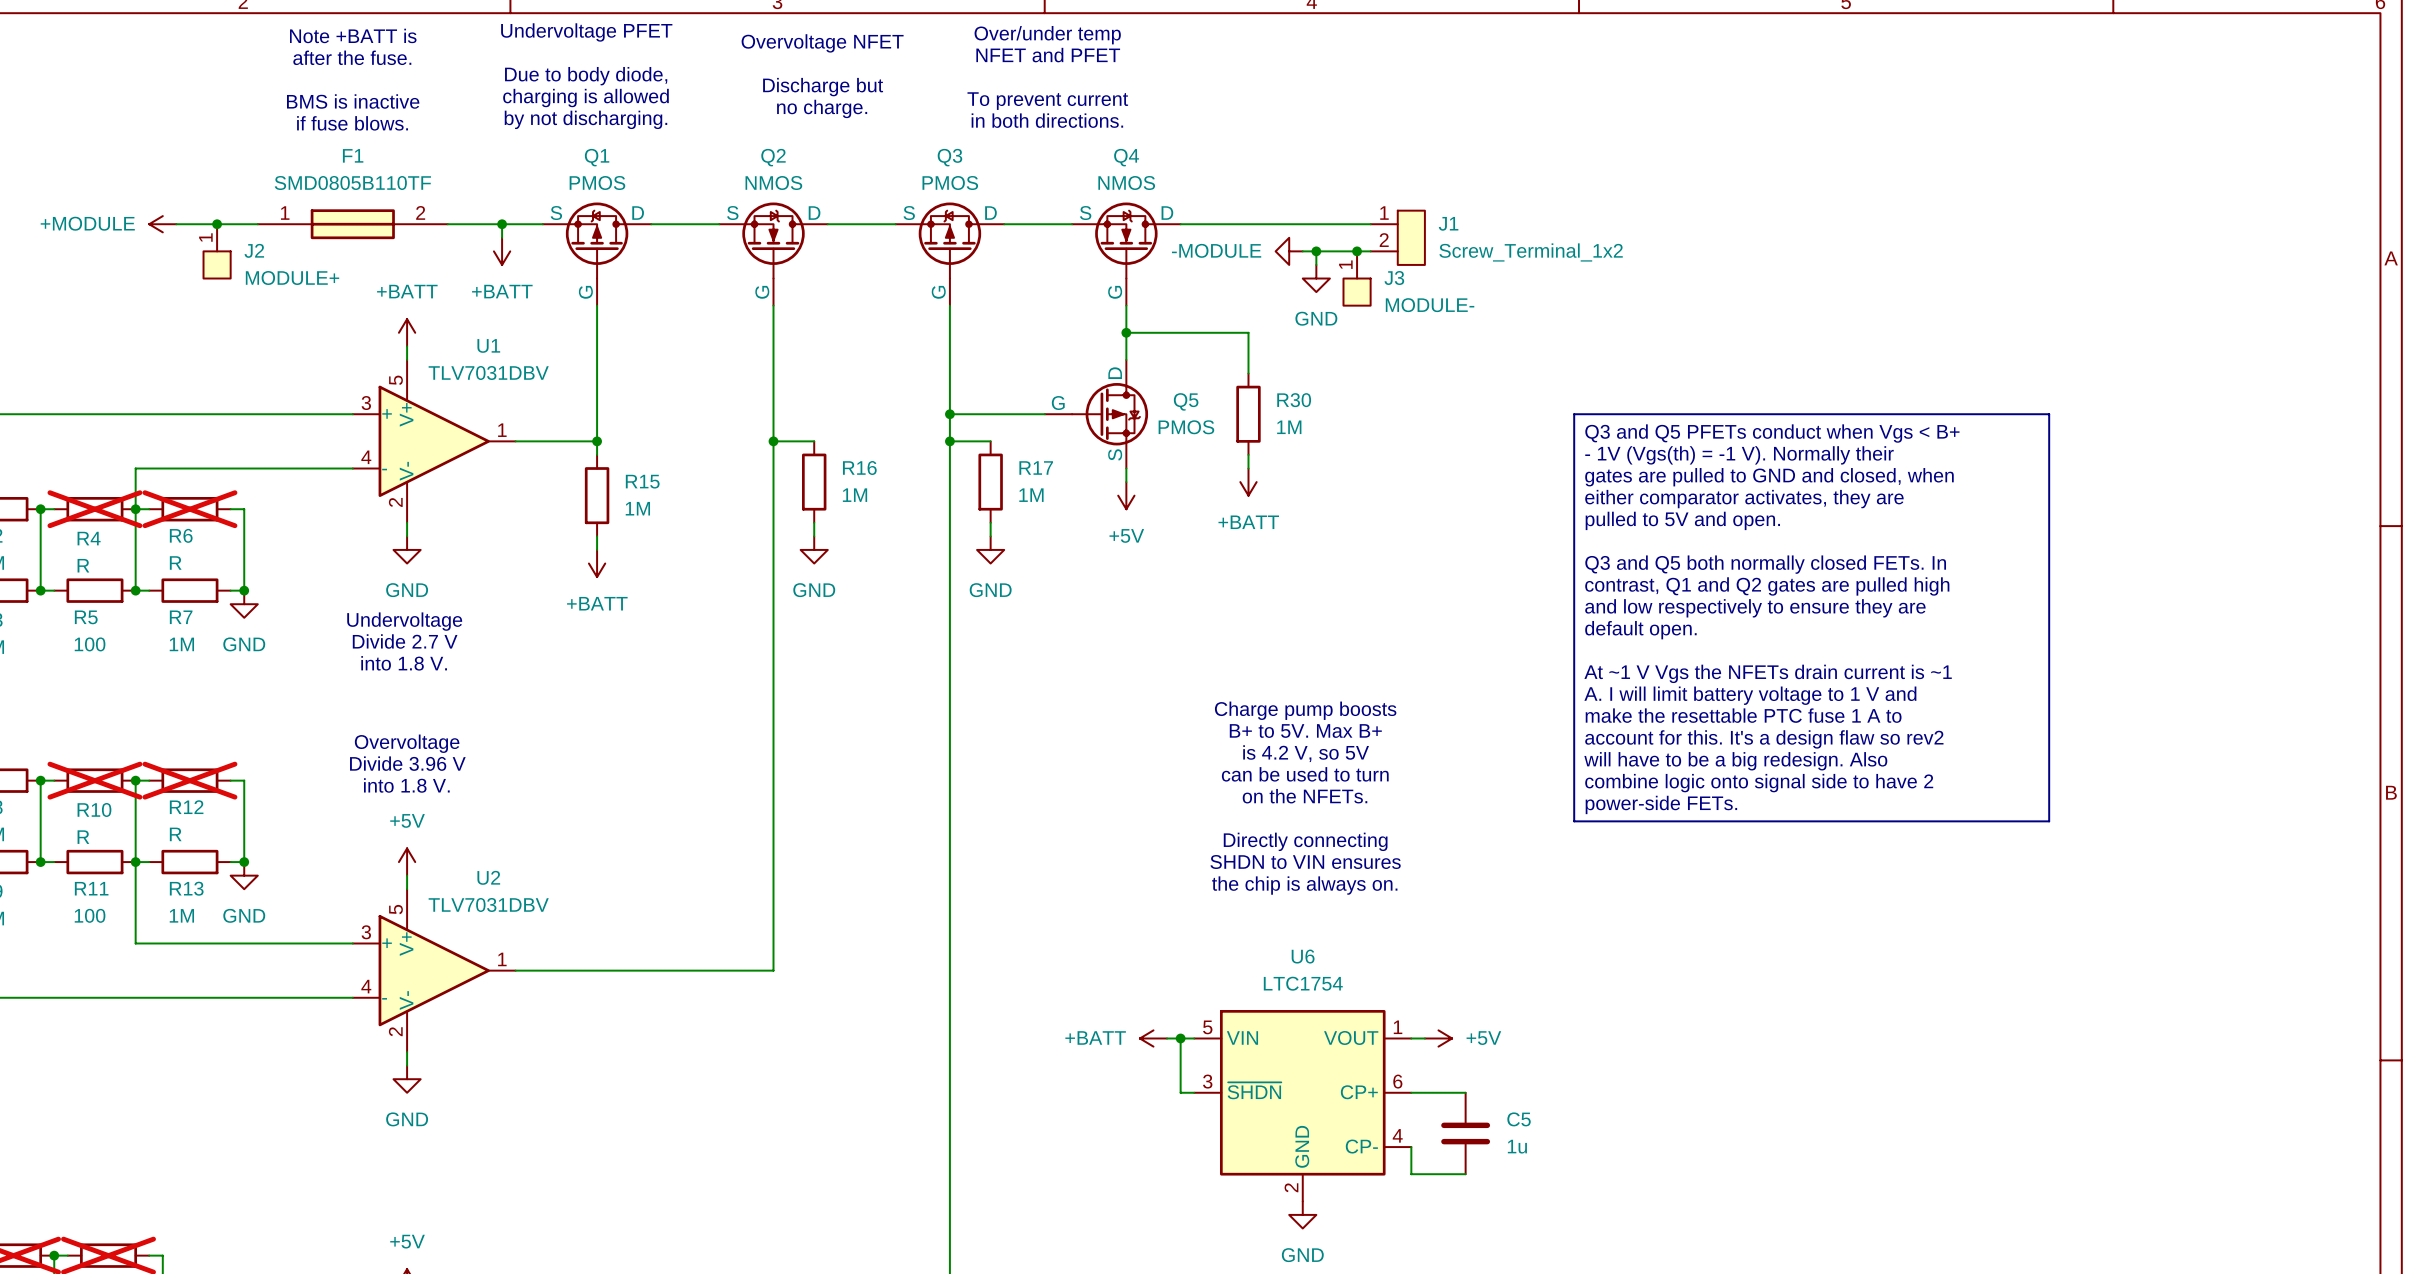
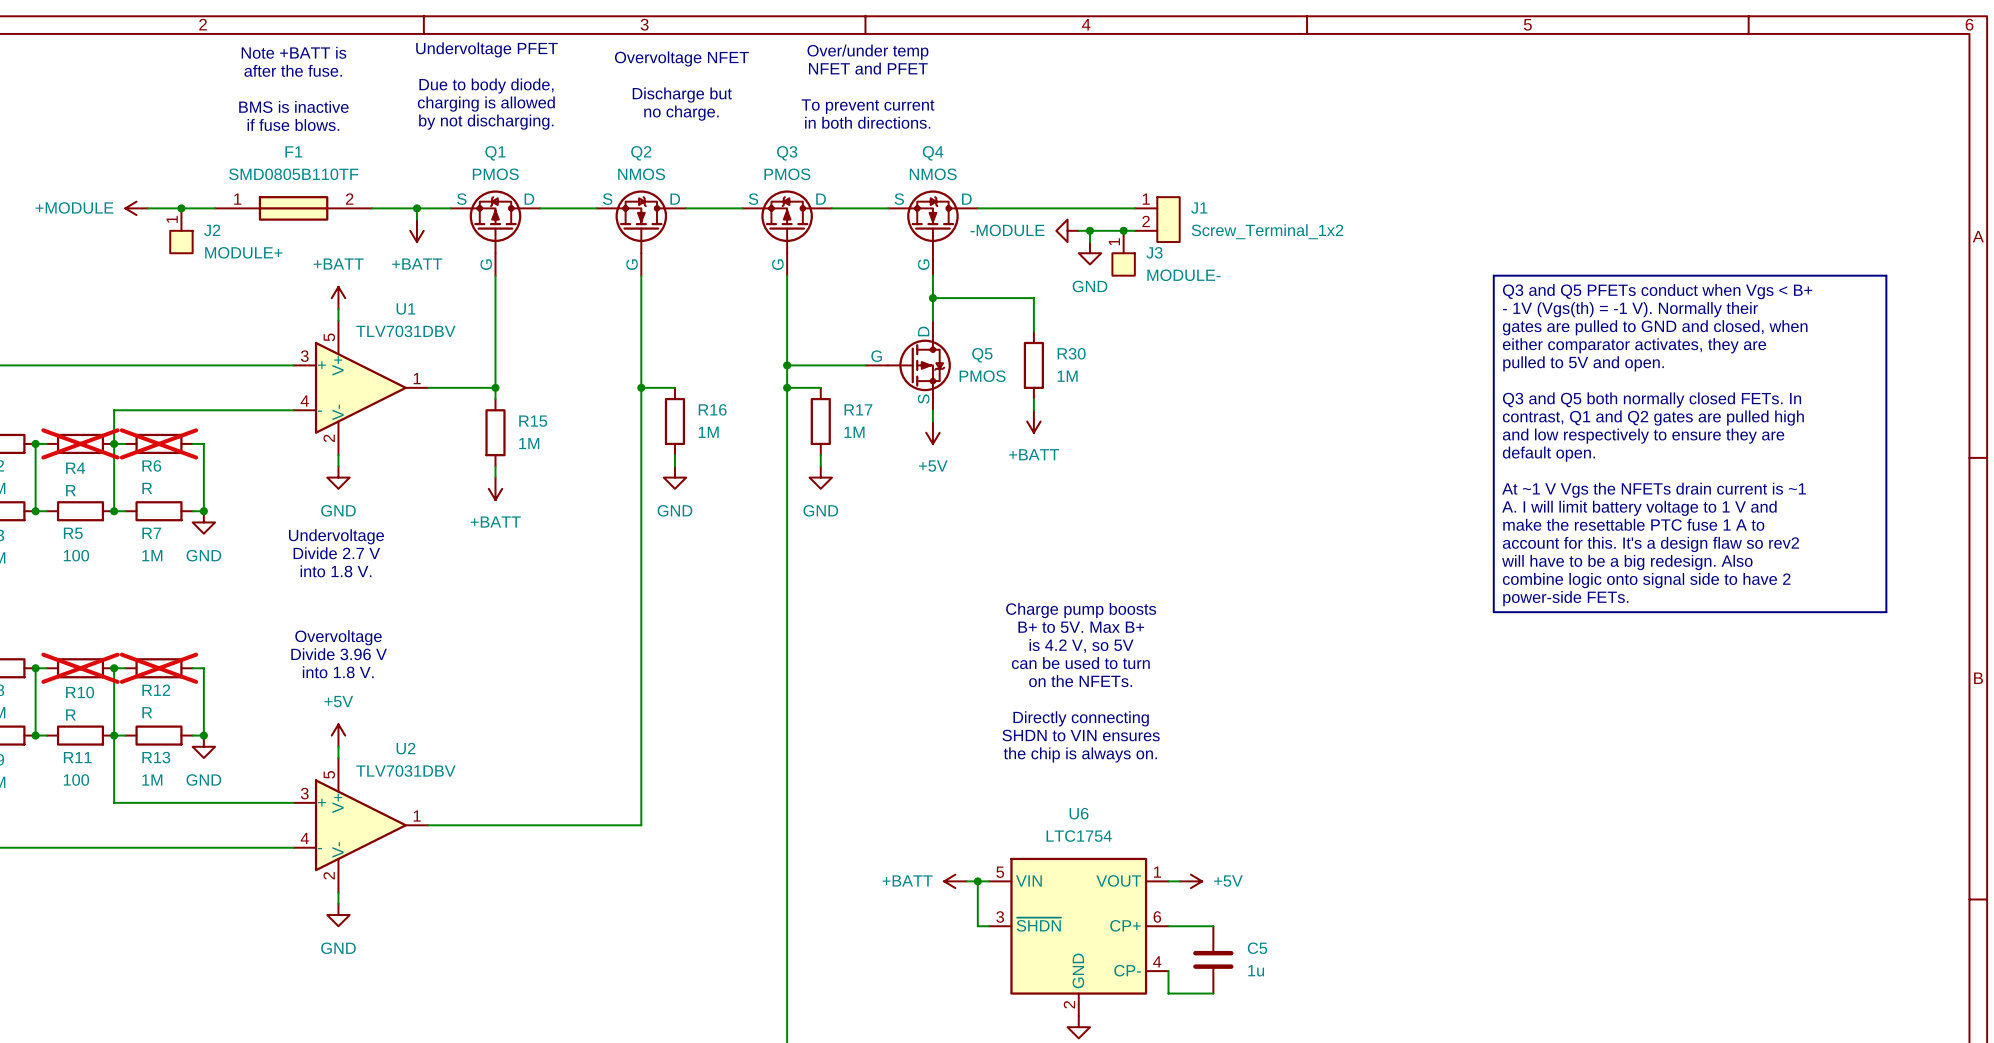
line: (1574, 414) (2049, 414) (2049, 821) (1574, 821) (1574, 414) -> (1493, 275) (1886, 275) (1886, 612) (1493, 612) (1493, 275)
text position: Q3 and Q5 PFETs conduct when Vgs < B+ (1772, 433) -> Q3 and Q5 PFETs conduct when Vgs < B+ (1657, 291)
text position: - 1V (Vgs(th) = -1 V). Normally their (1739, 455) -> - 1V (Vgs(th) = -1 V). Normally their (1630, 309)
text position: gates are pulled to GND and closed, when (1769, 477) -> gates are pulled to GND and closed, when (1655, 327)
text position: either comparator activates, they are (1744, 499) -> either comparator activates, they are (1634, 345)
text position: pulled to 5V and open. (1682, 520) -> pulled to 5V and open. (1583, 363)
text position: Q3 and Q5 both normally closed FETs. In (1765, 564) -> Q3 and Q5 both normally closed FETs. In (1652, 399)
text position: contrast, Q1 and Q2 gates are pulled high (1767, 586) -> contrast, Q1 and Q2 gates are pulled high (1653, 418)
text position: and low respectively to ensure they are (1755, 608) -> and low respectively to ensure they are (1643, 436)
text position: default open. (1640, 630) -> default open. (1548, 454)
text position: At ~1 V Vgs the NFETs drain current is ~1 (1768, 673) -> At ~1 V Vgs the NFETs drain current is ~1 (1654, 490)
text position: A. I will limit battery voltage to 1 V and (1750, 695) -> A. I will limit battery voltage to 1 V and (1639, 508)
text position: make the resettable PTC fuse 1 A to (1743, 715) -> make the resettable PTC fuse 1 A to (1633, 524)
text position: account for this. It's a design flaw so rev2 (1764, 739) -> account for this. It's a design flaw so rev2 (1650, 544)
text position: will have to be a big redesign. Also (1735, 761) -> will have to be a big redesign. Also (1627, 562)
text position: combine logic onto signal side to have 2 (1759, 783) -> combine logic onto signal side to have 2 (1646, 580)
text position: power-side FETs. (1661, 804) -> power-side FETs. (1565, 598)

